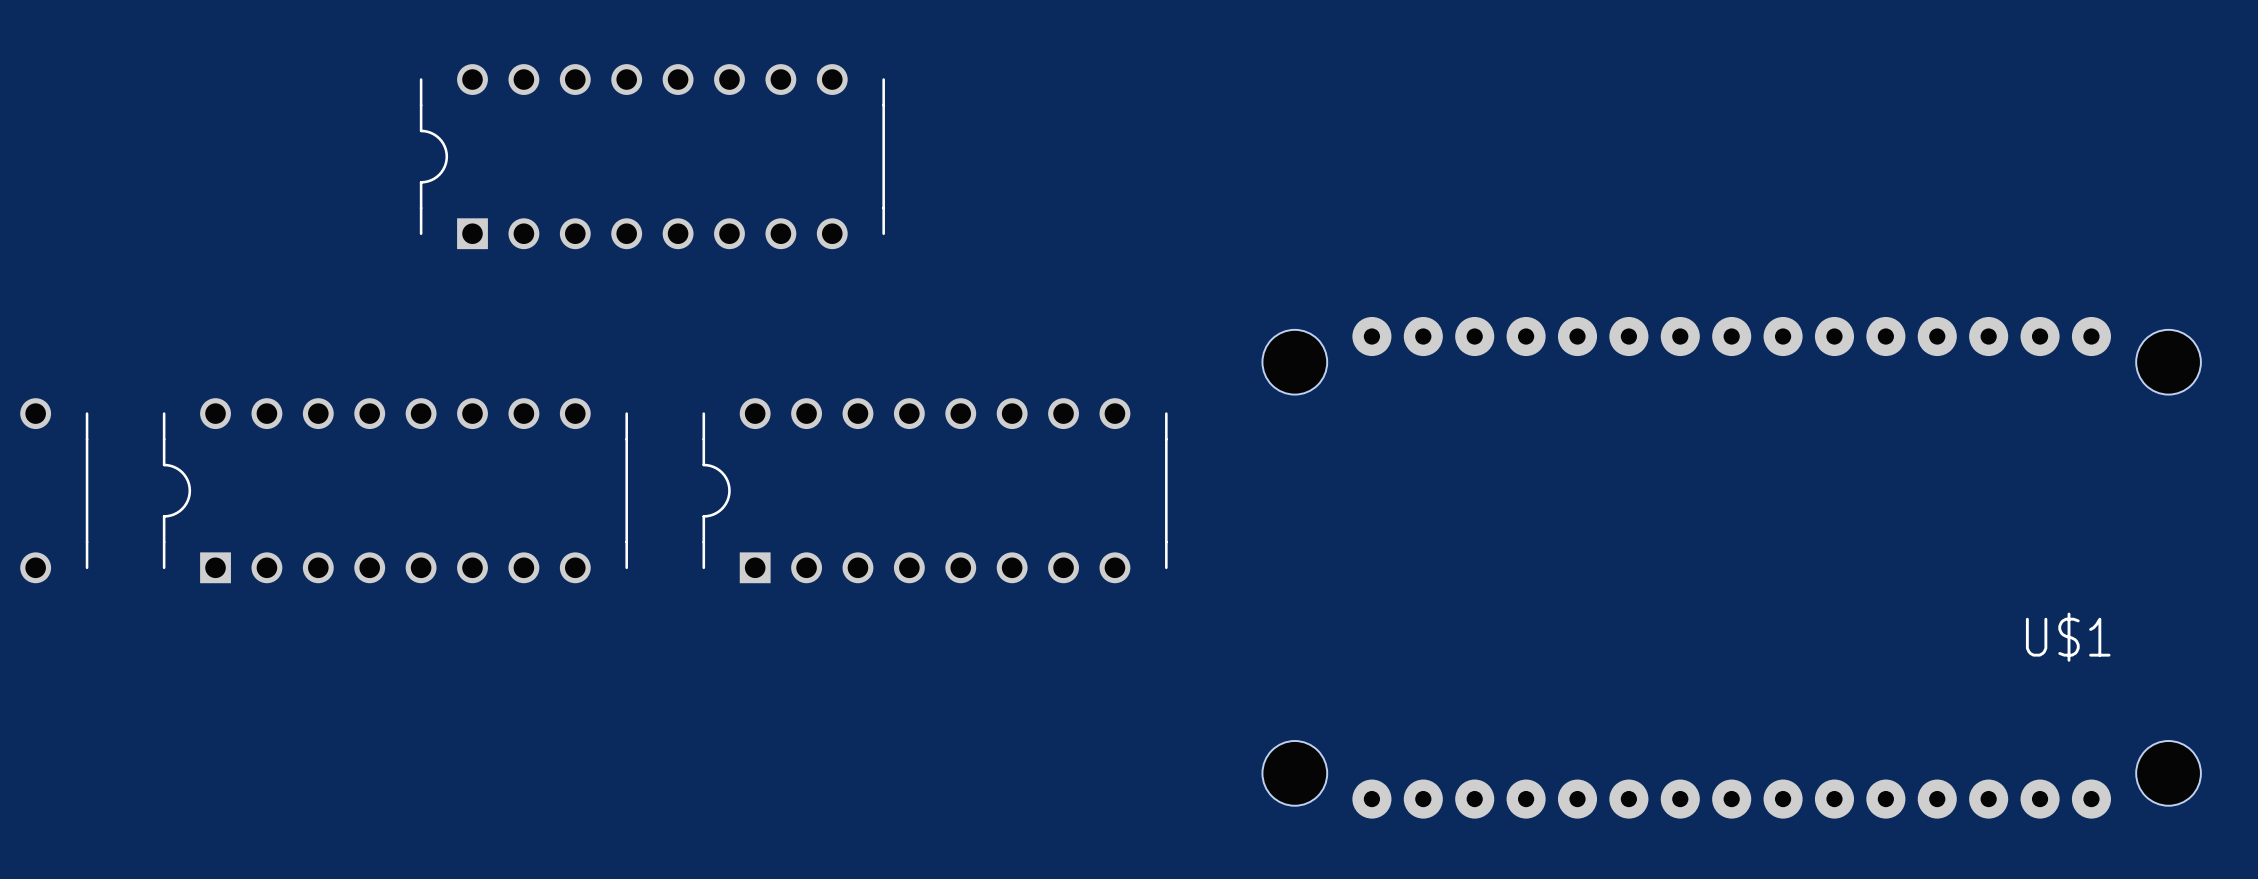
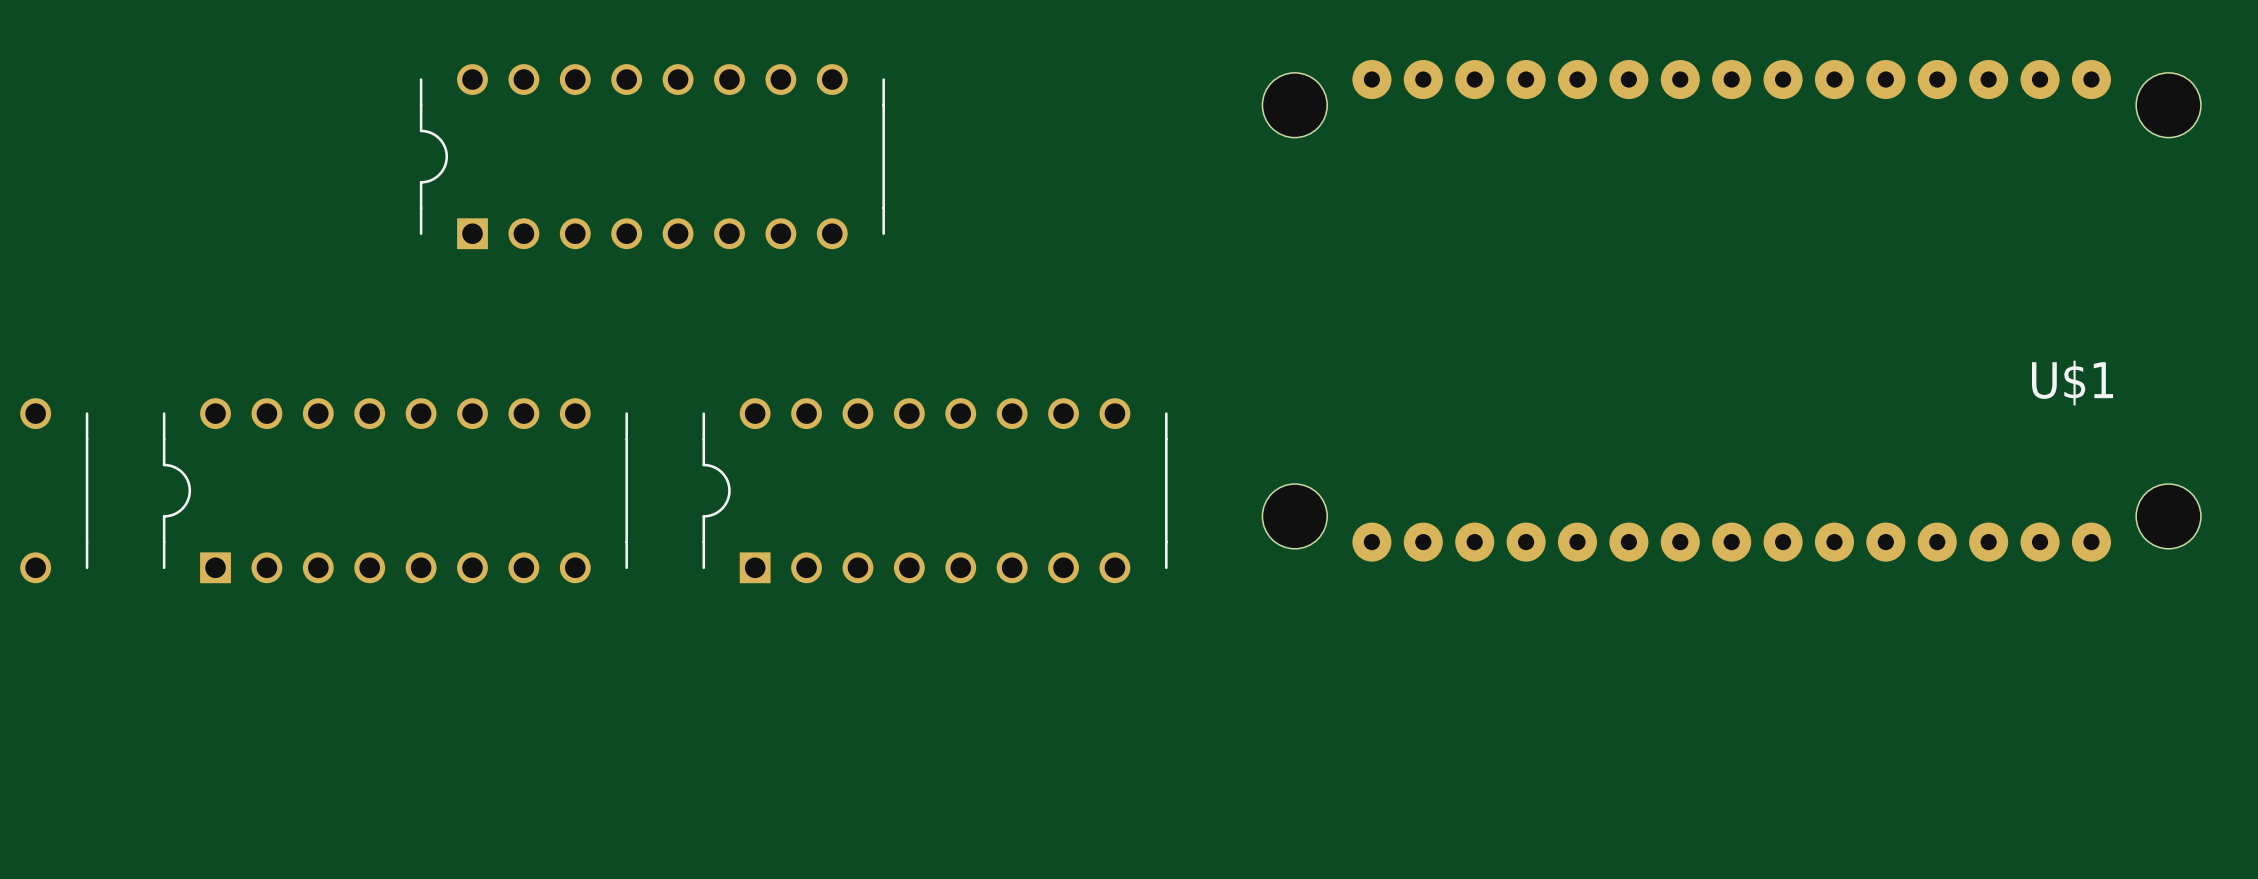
U$1 position: (1731, 567) -> (1731, 310)

